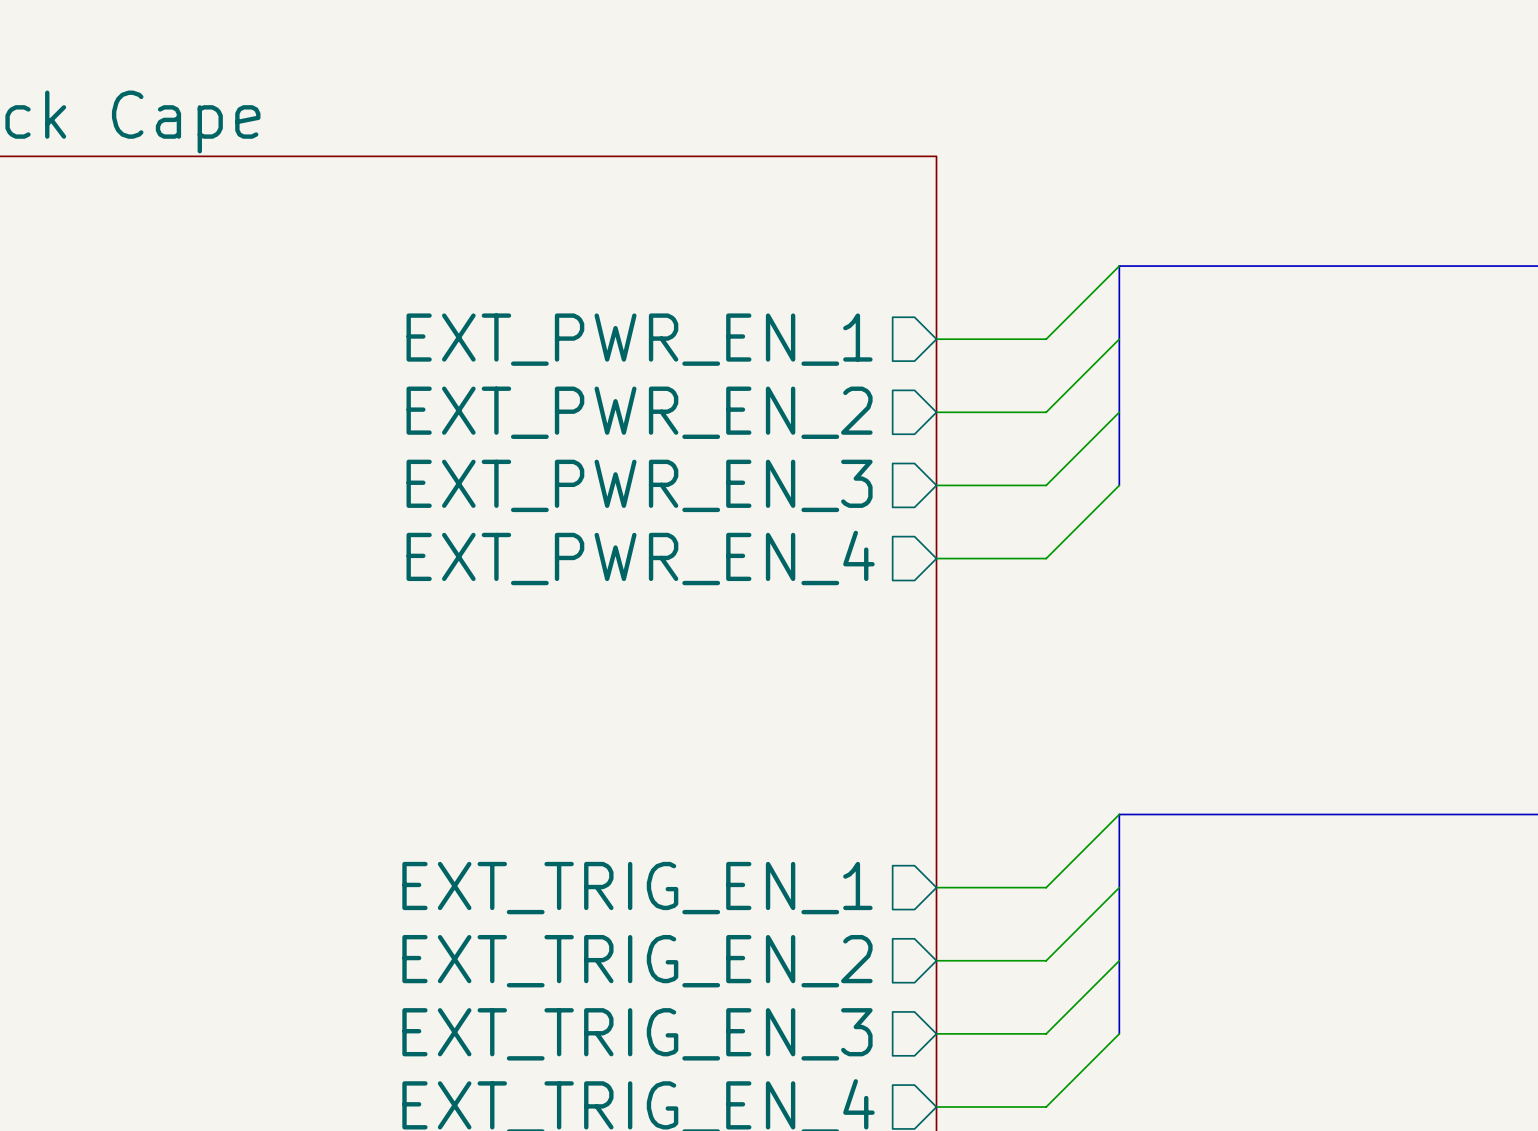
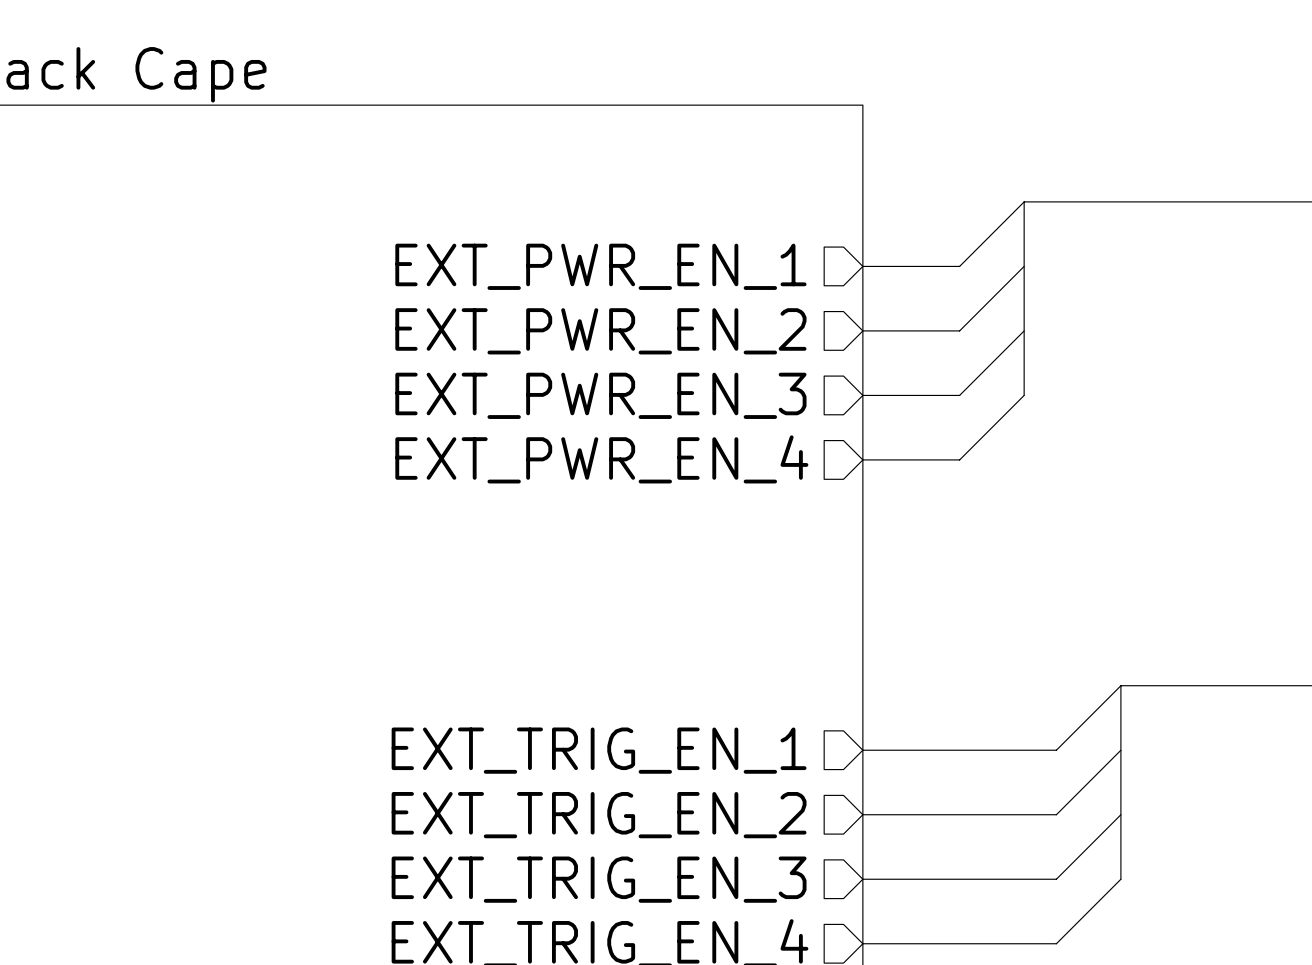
wire: (1119, 814) (1046, 887) -> (1120, 685) (1056, 750) (959, 750)
bus: (1229, 814) (1119, 814) (1119, 1033) -> (1120, 685) (1120, 879)
wire: (1119, 887) (1046, 960) -> (1120, 750) (1056, 814) (959, 814)
wire: (1119, 960) (1046, 1033) -> (1120, 814) (1056, 879) (959, 879)
wire: (1119, 1033) (1046, 1107) -> (1120, 879) (1056, 943) (959, 943)

